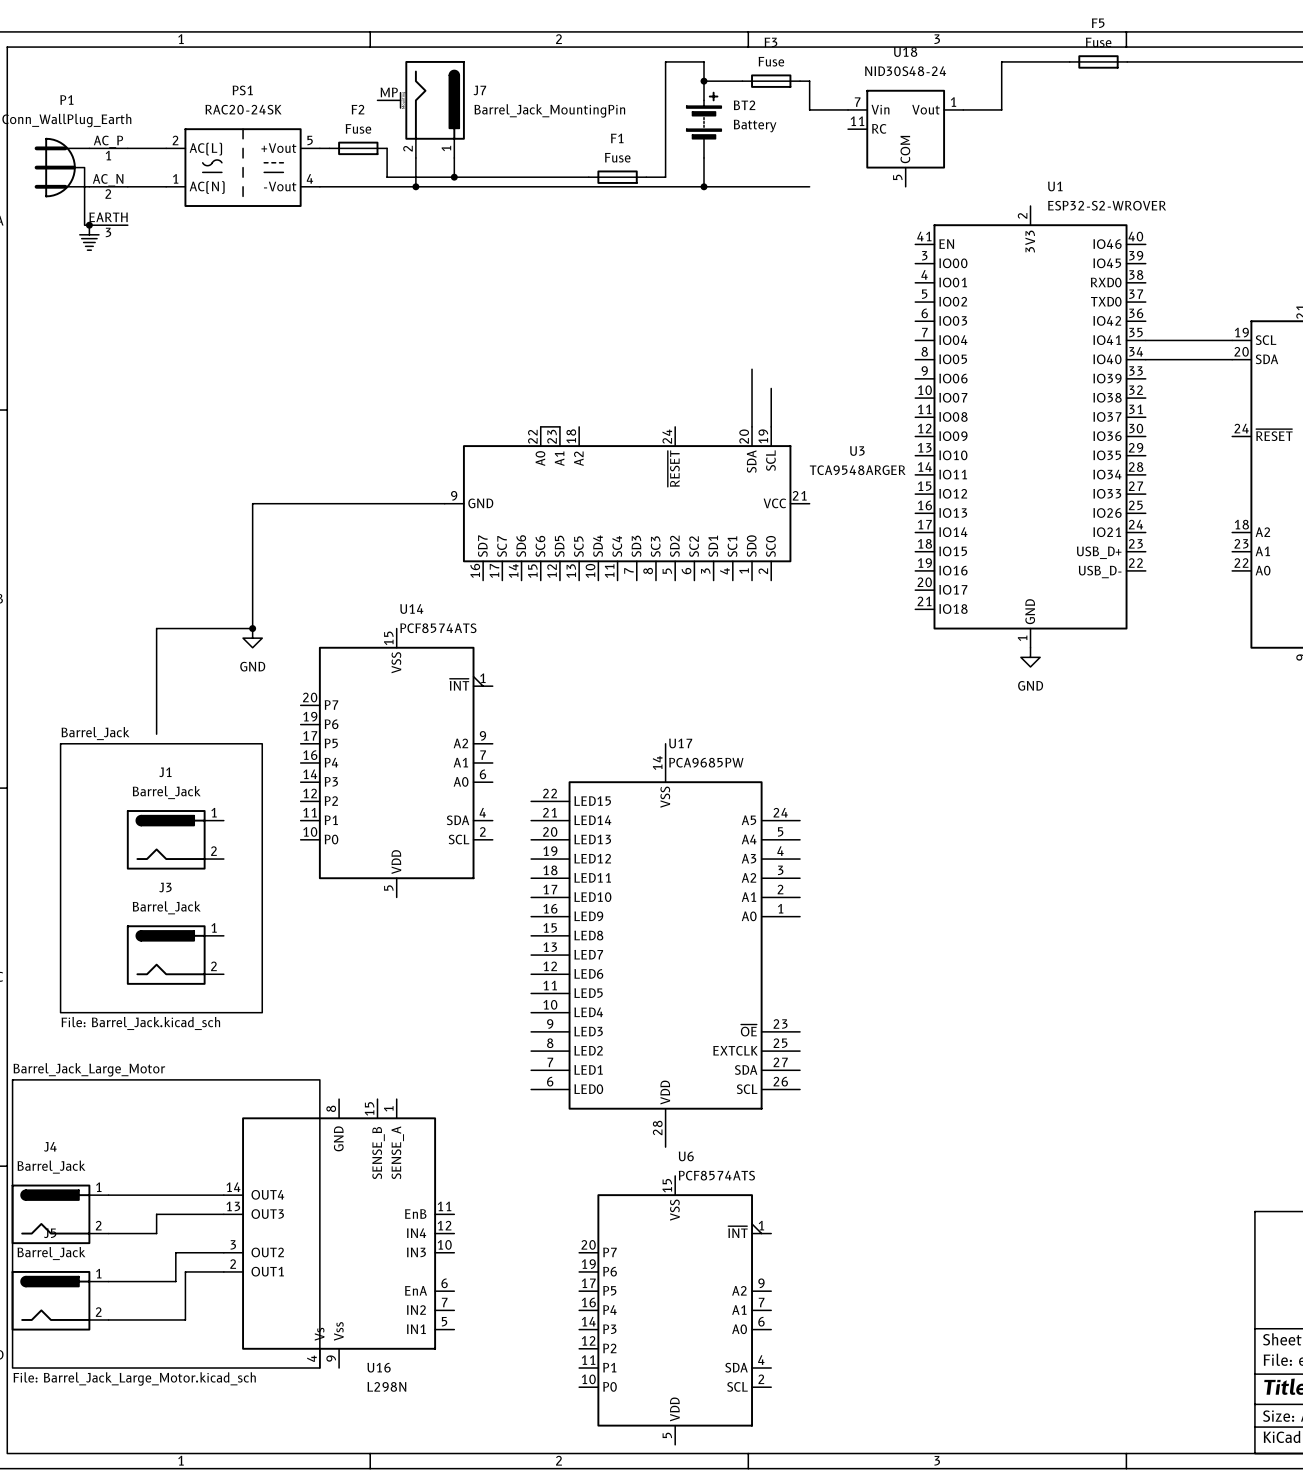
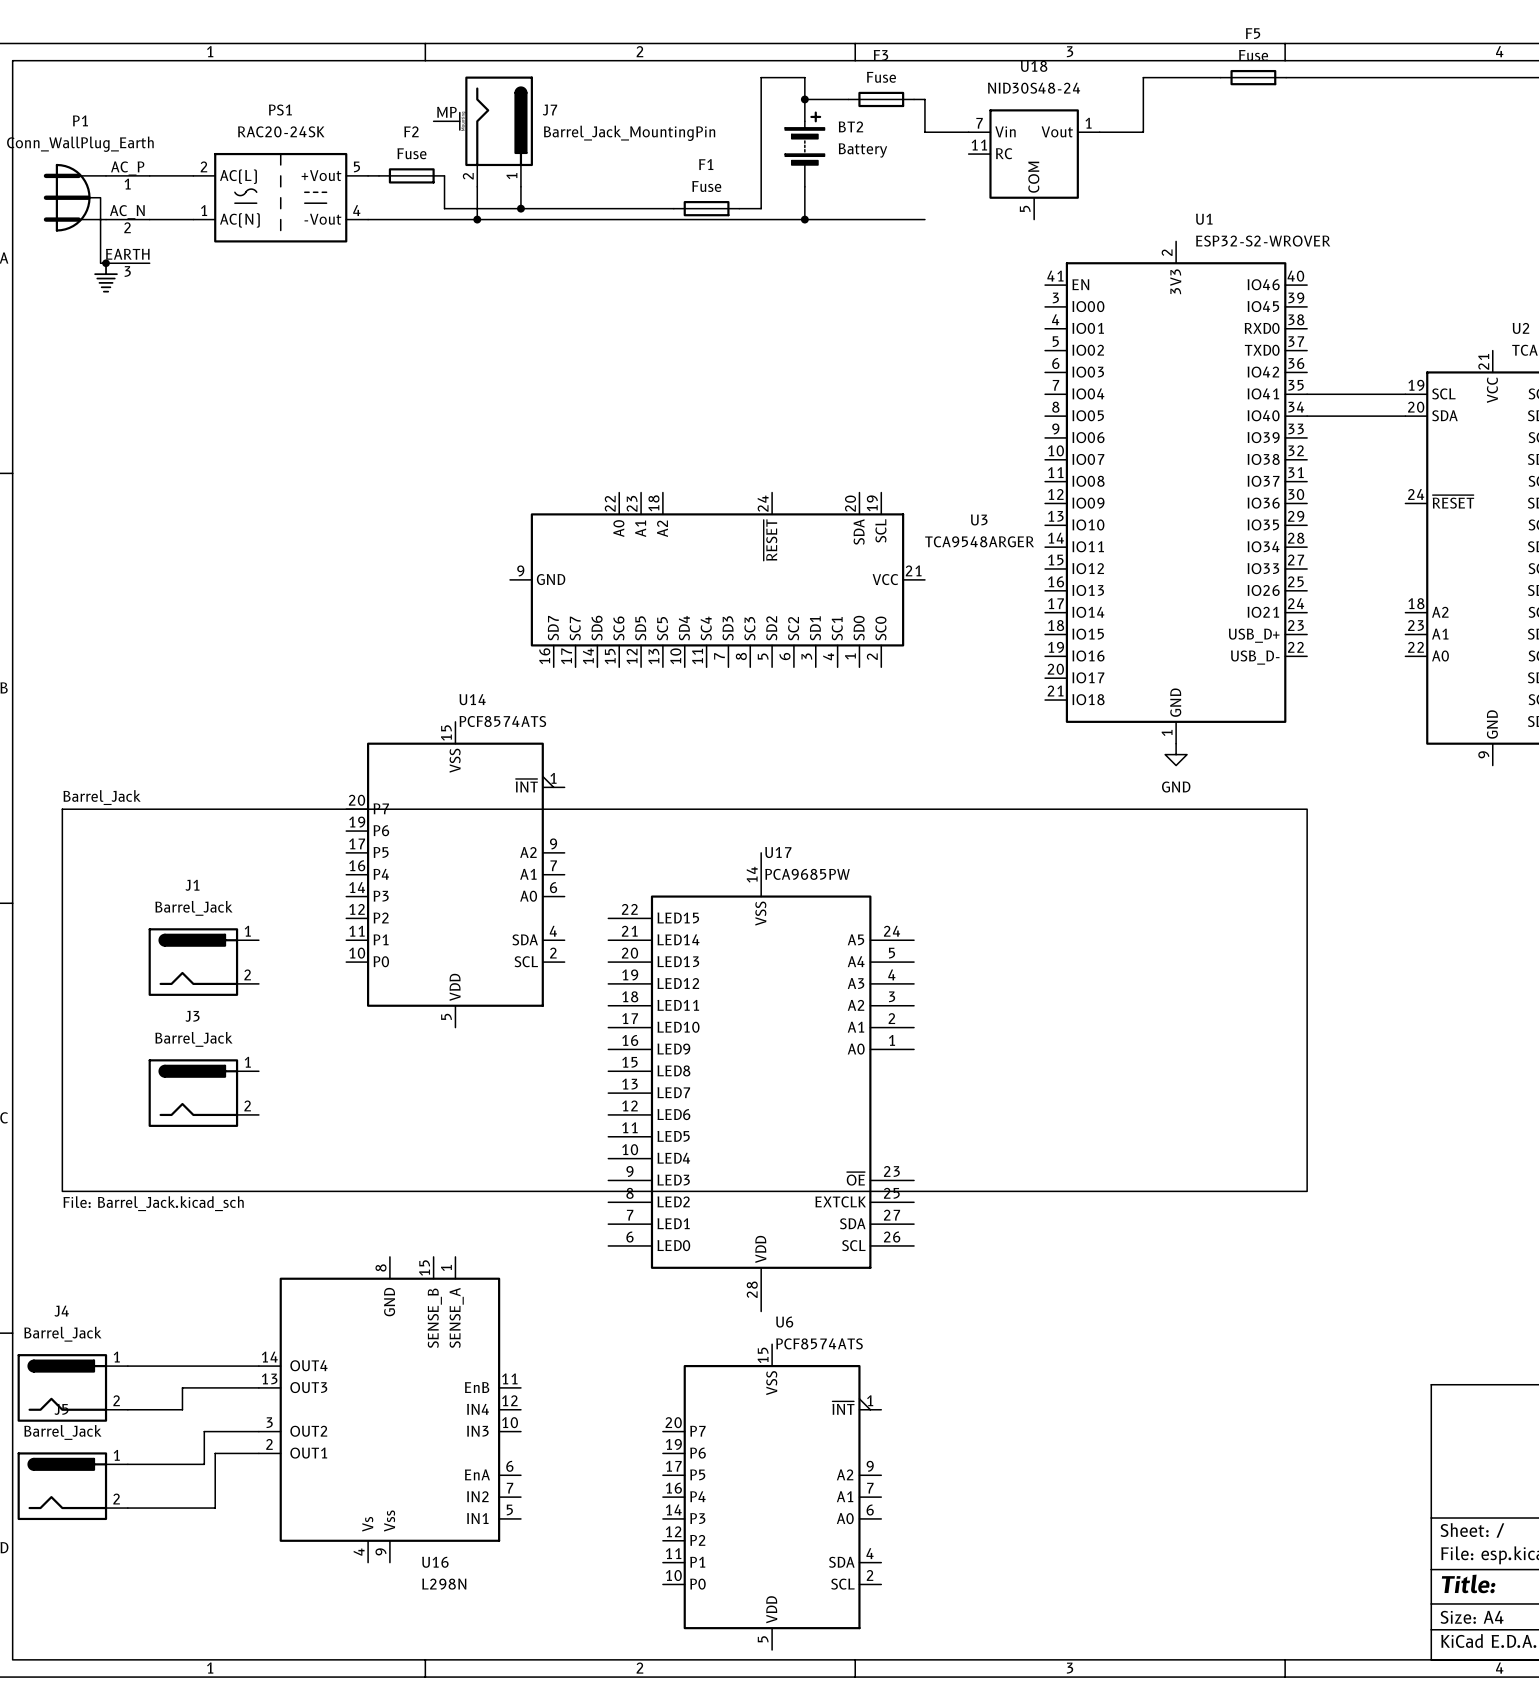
wire: (752, 369) (752, 426) -> none
wire: (771, 388) (771, 426) -> none
wire: (540, 426) (559, 426) -> none
wire: (444, 503) (252, 503) (252, 628) (156, 628) (156, 734) -> none
junction: (252, 628) -> none
power symbol: GND (252, 638) -> none
sheet Barrel_Jack: none -> File: Barrel_Jack.kicad_sch (684, 1000)
sheet Barrel_Jack: File: Barrel_Jack.kicad_sch (161, 878) -> none
sheet Barrel_Jack_Large_Motor: File: Barrel_Jack_Large_Motor.kicad_sch (166, 1223) -> none

